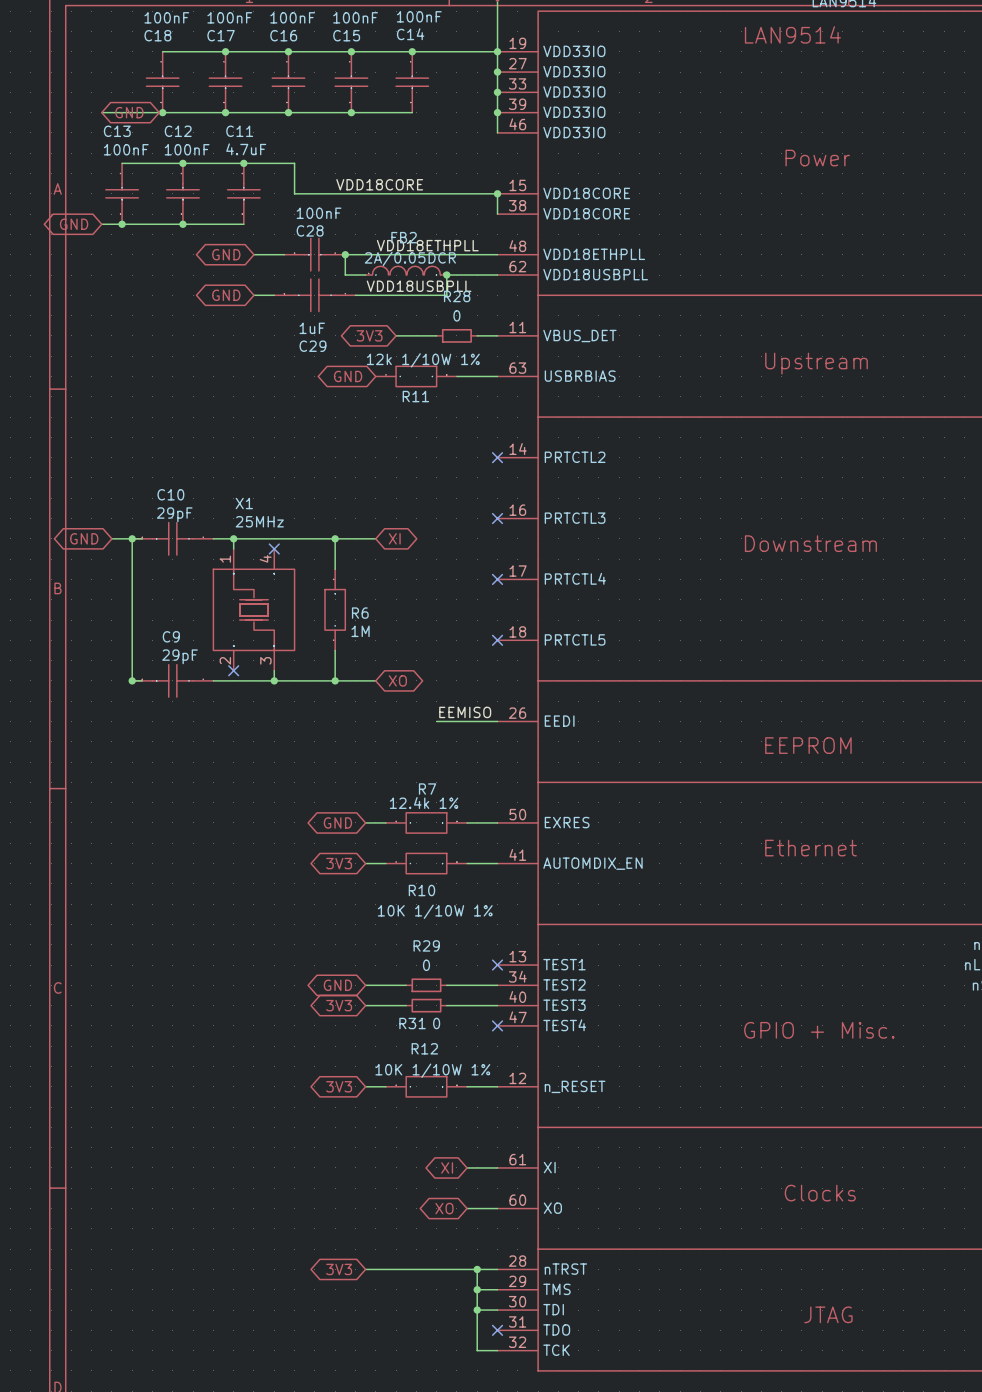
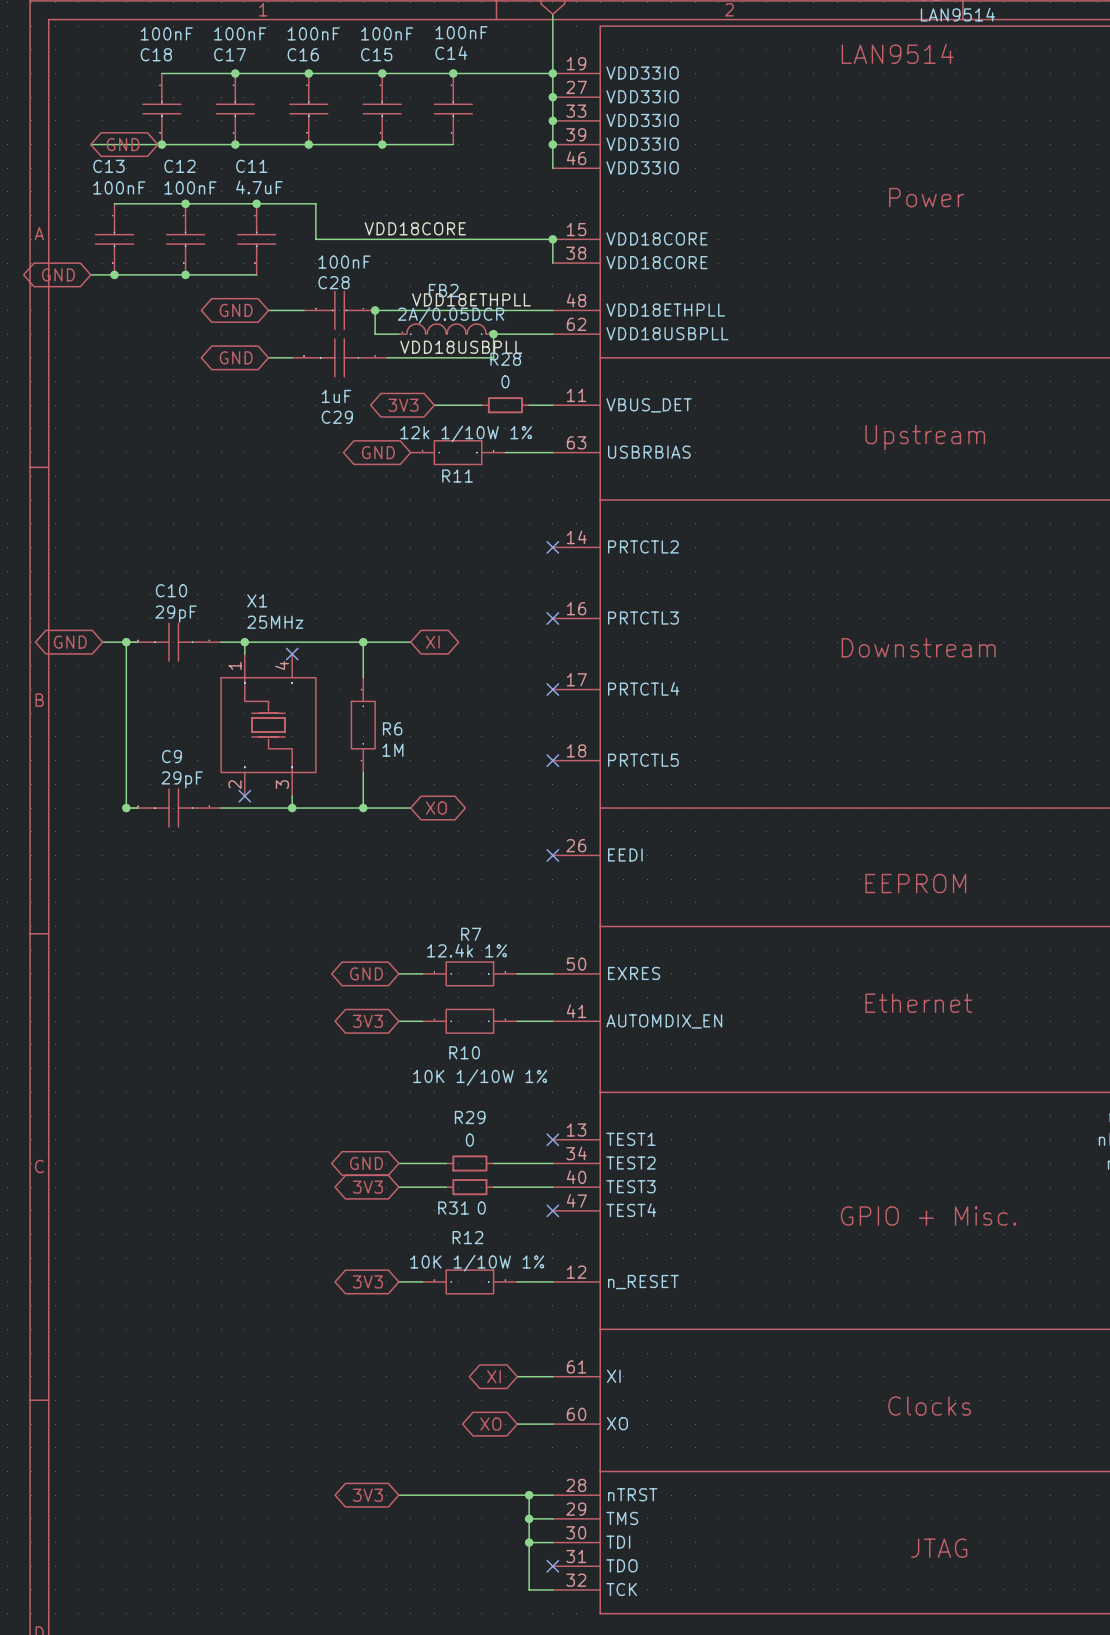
label: EEMISO (465, 712) -> none
wire: (436, 721) (497, 721) -> none
no-connect mark: none -> (552, 855)

